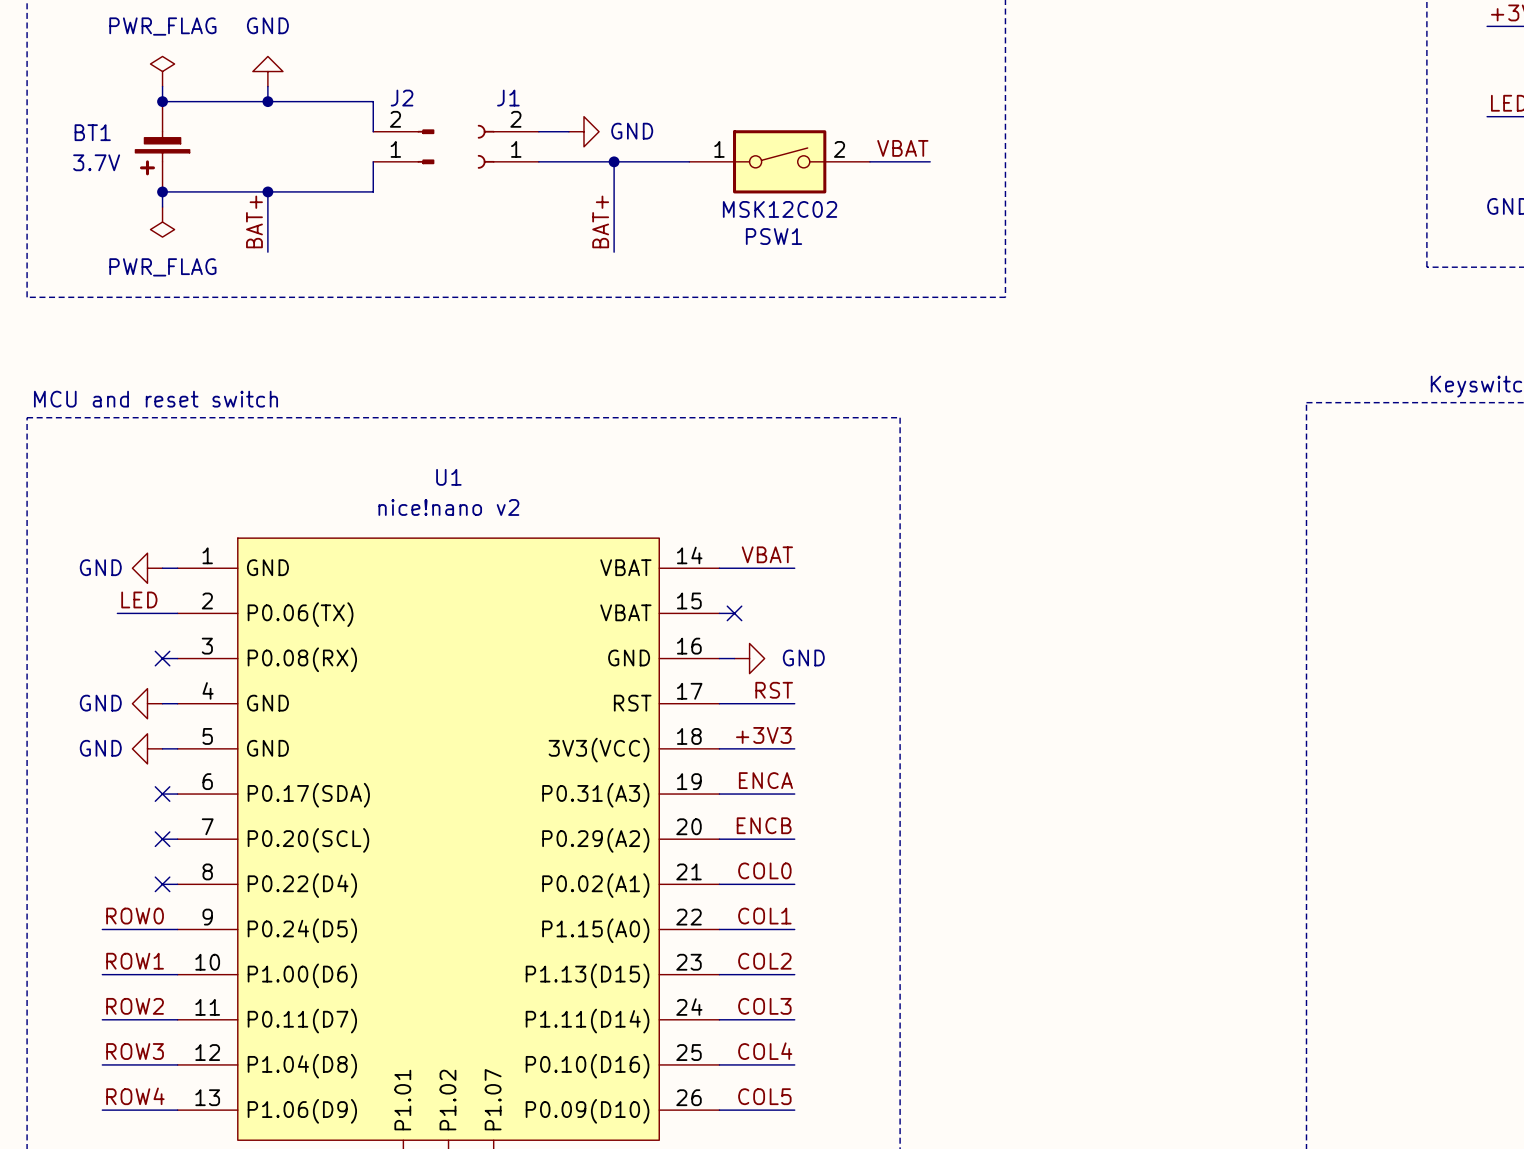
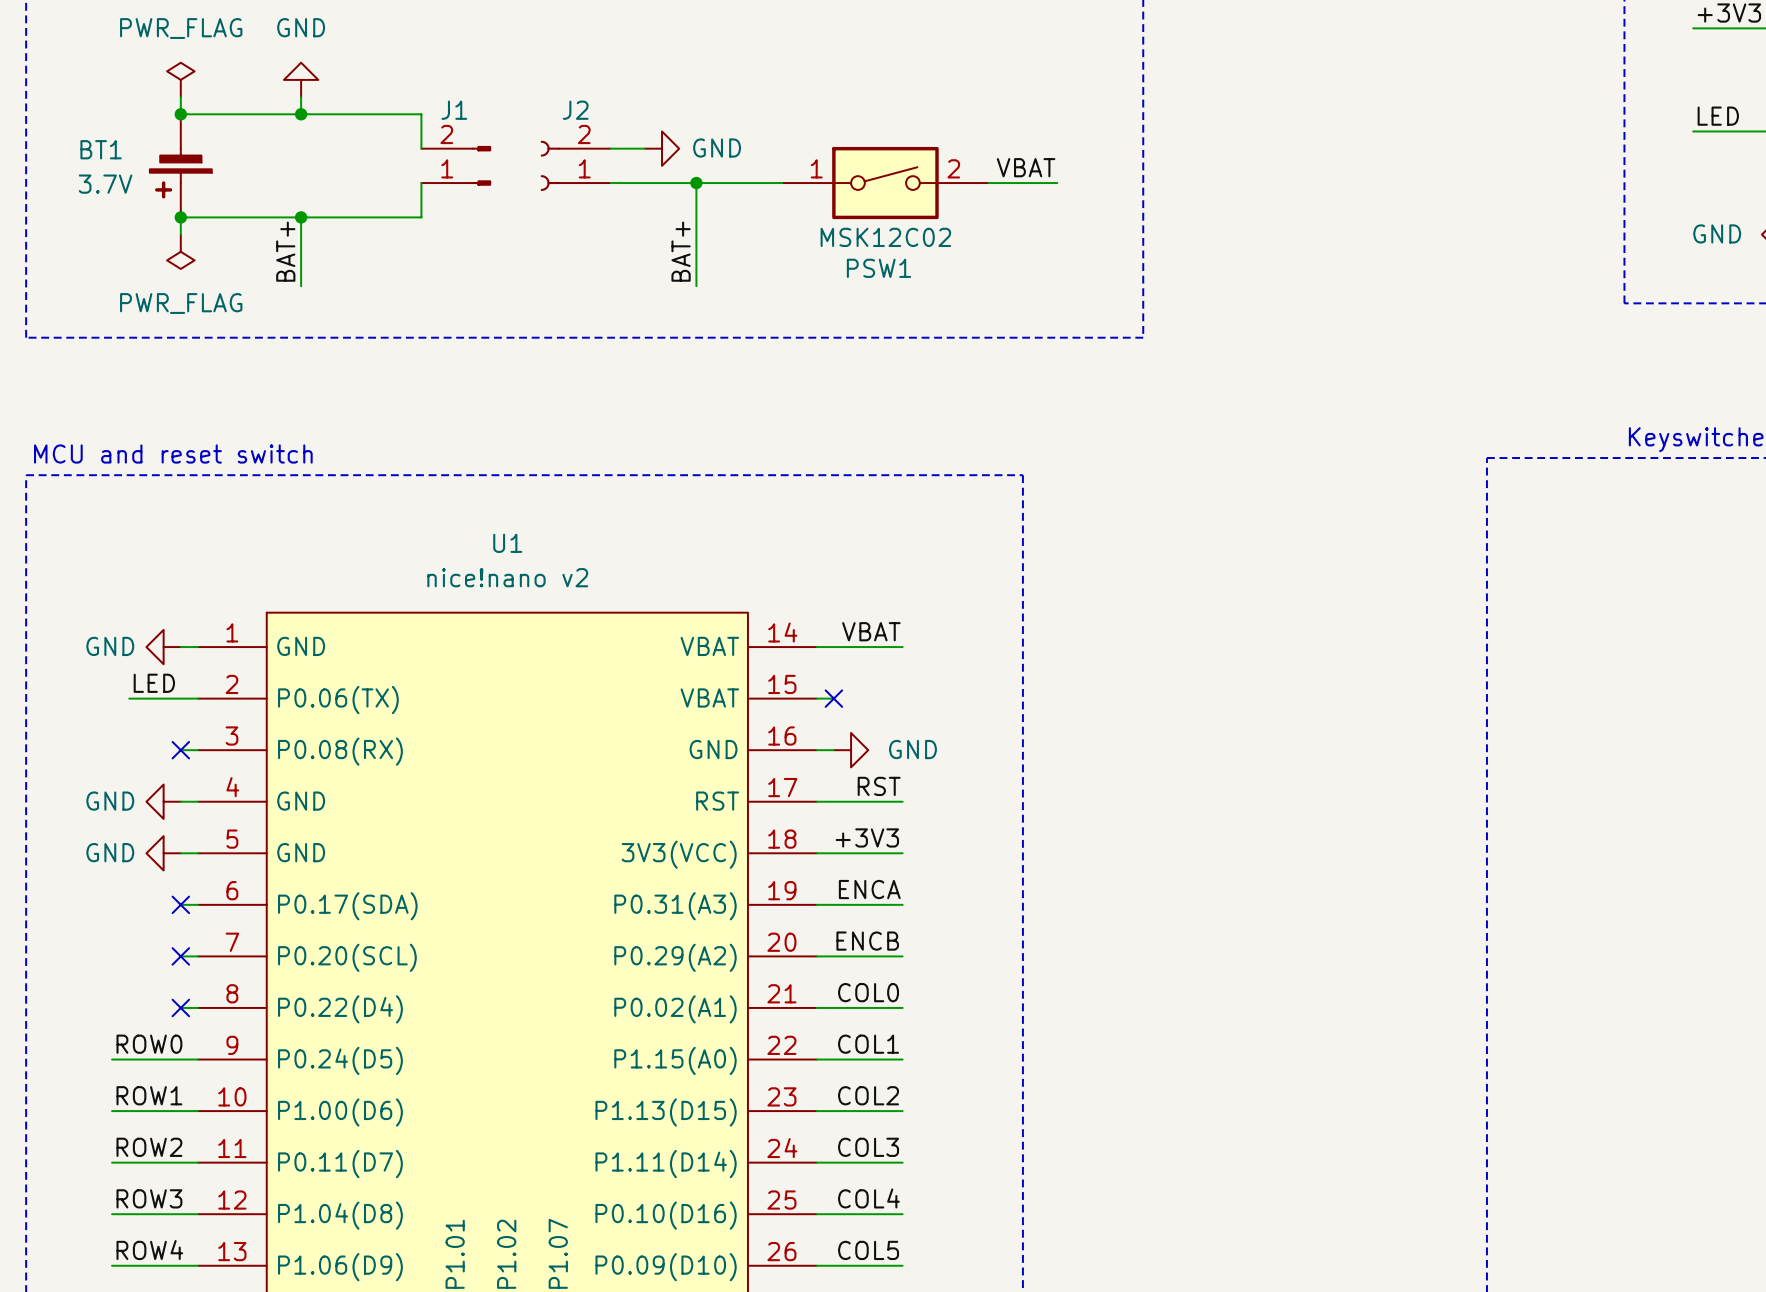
J2 name: J2 (402, 98) -> J1 (454, 110)
J1 name: J1 (508, 98) -> J2 (575, 110)

